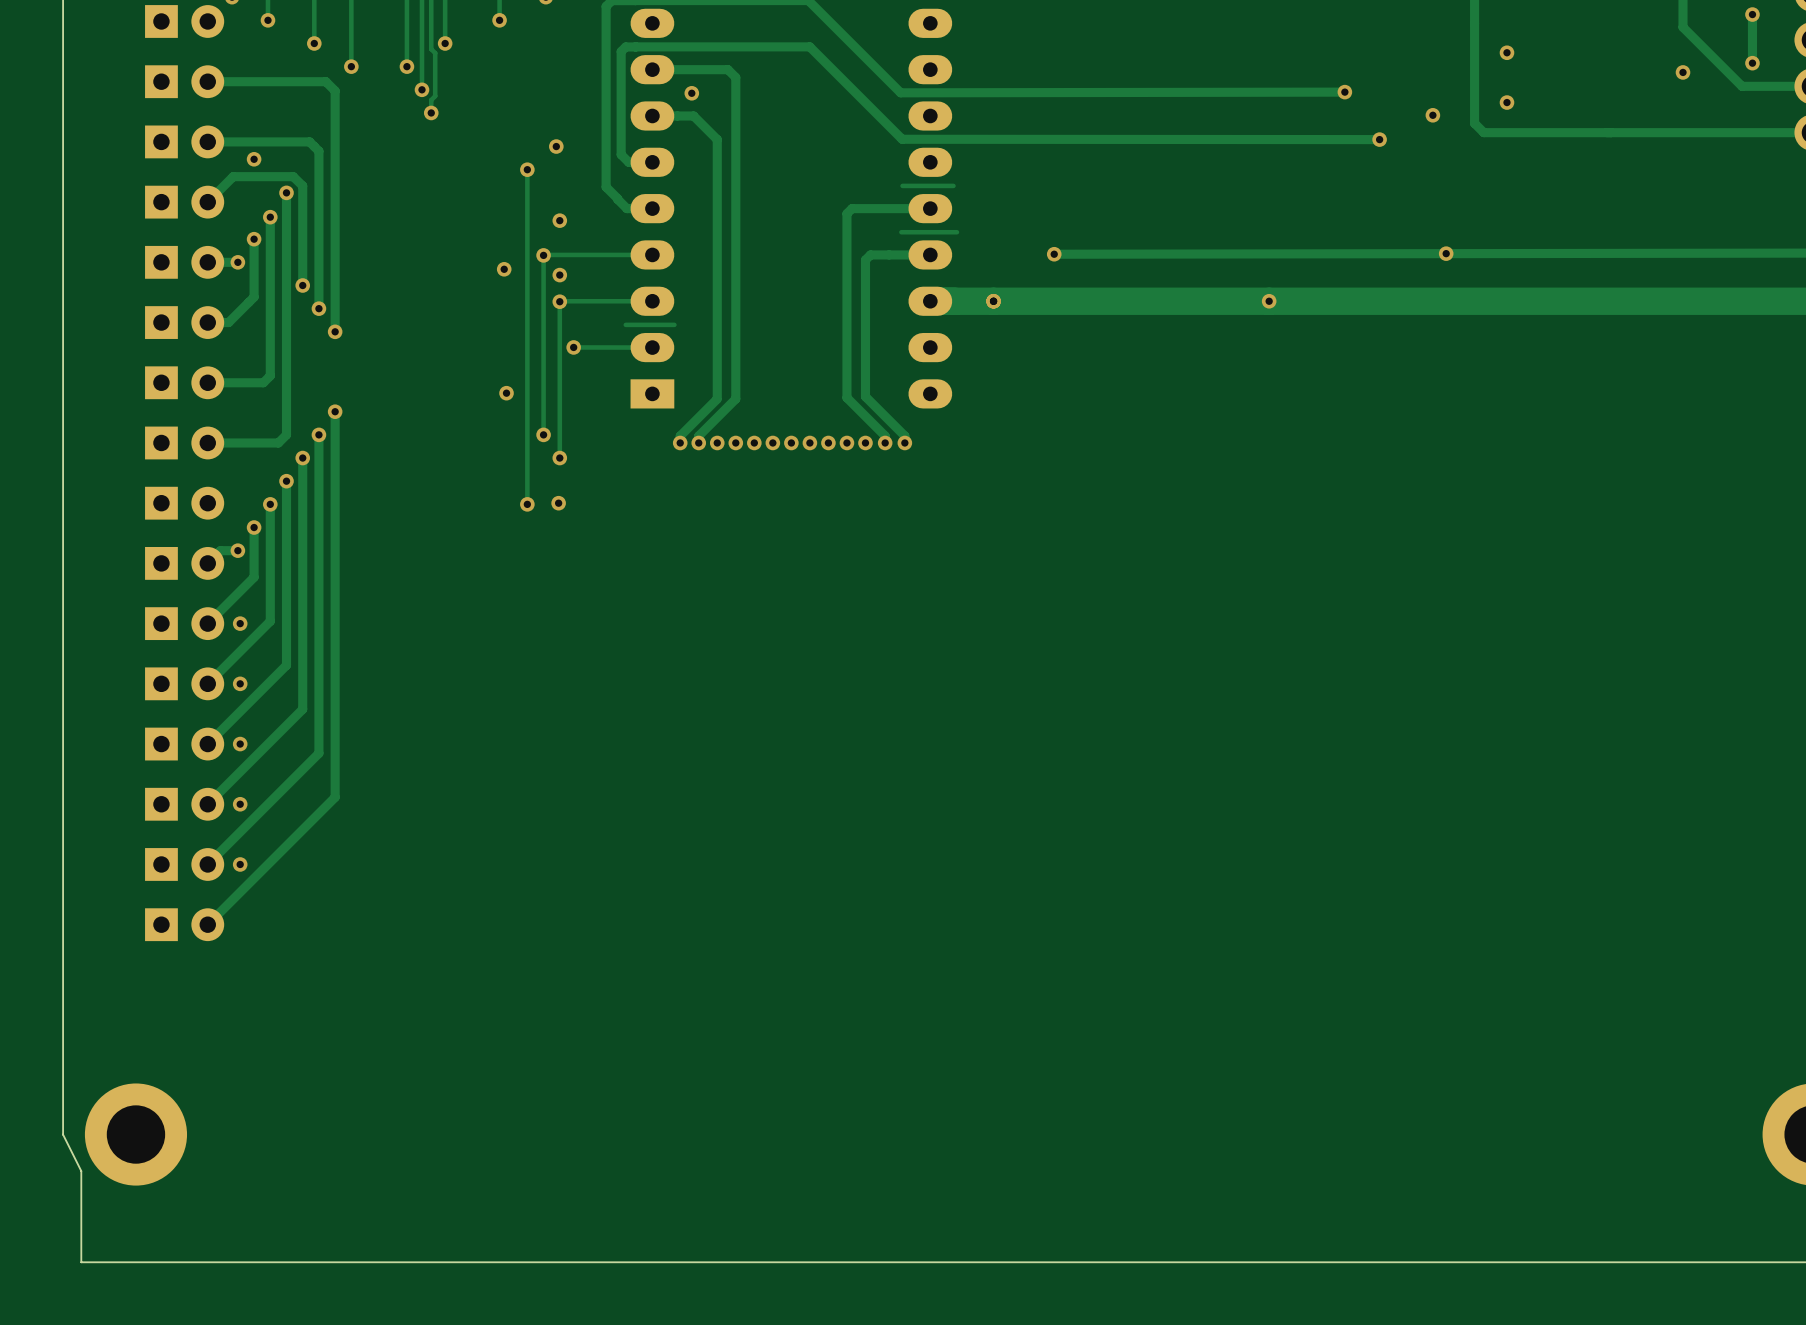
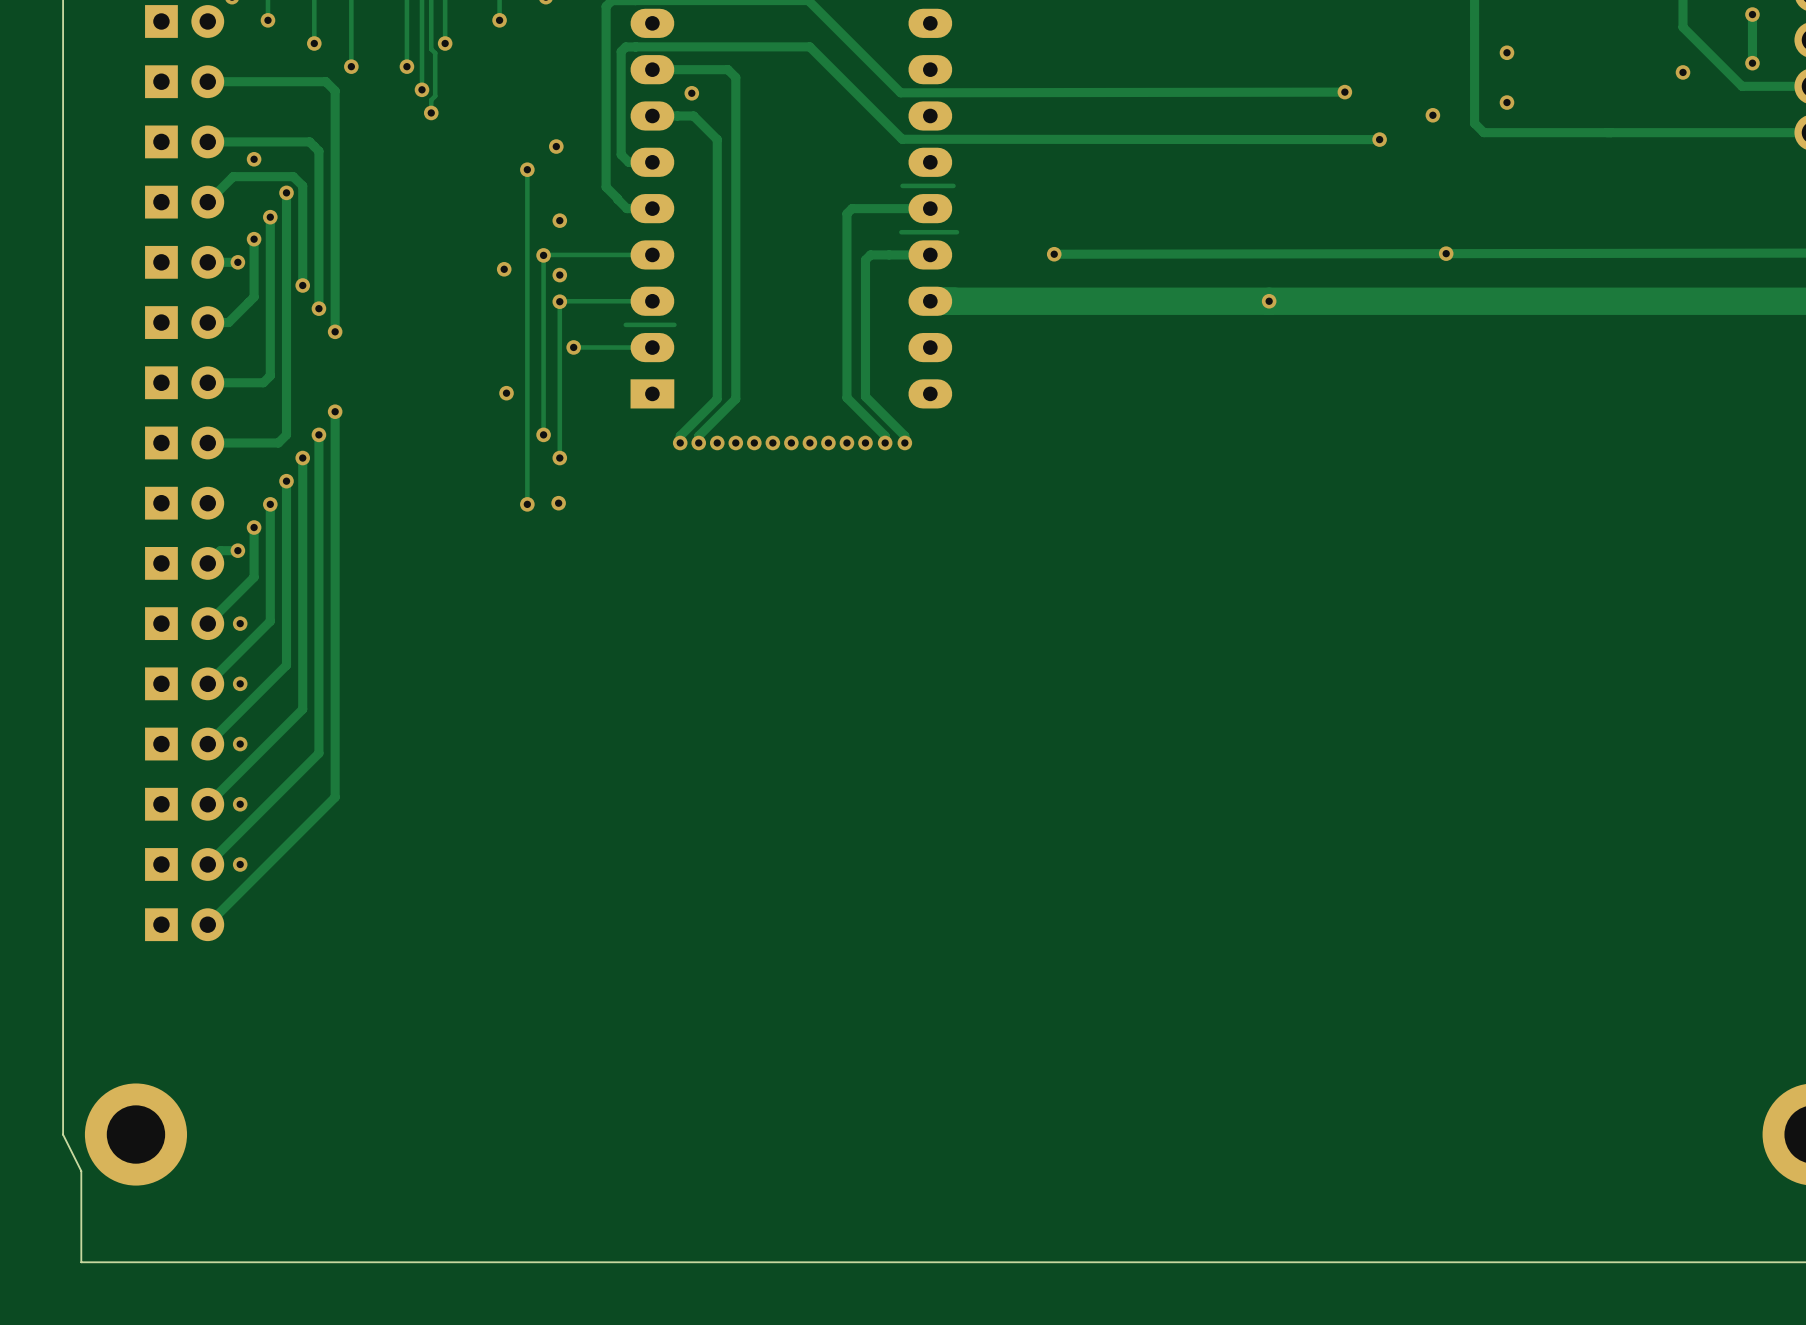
via: (993, 301) -> none

